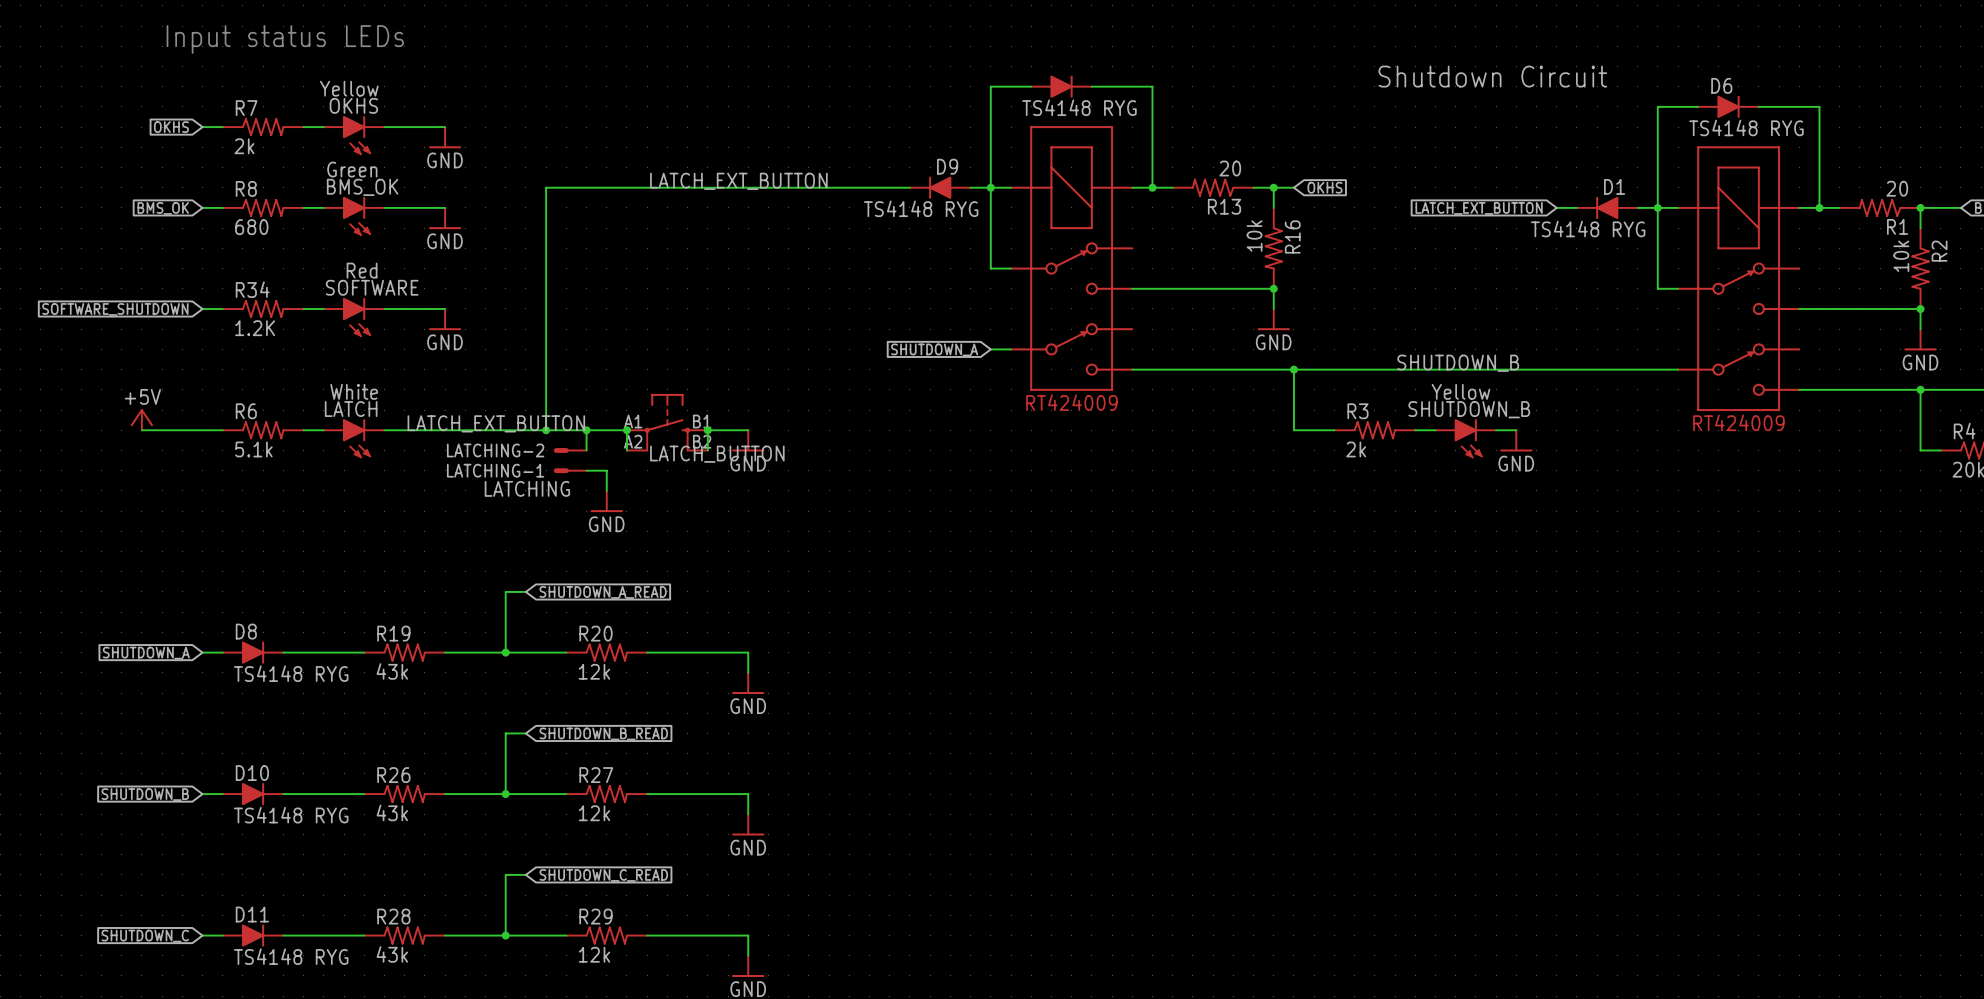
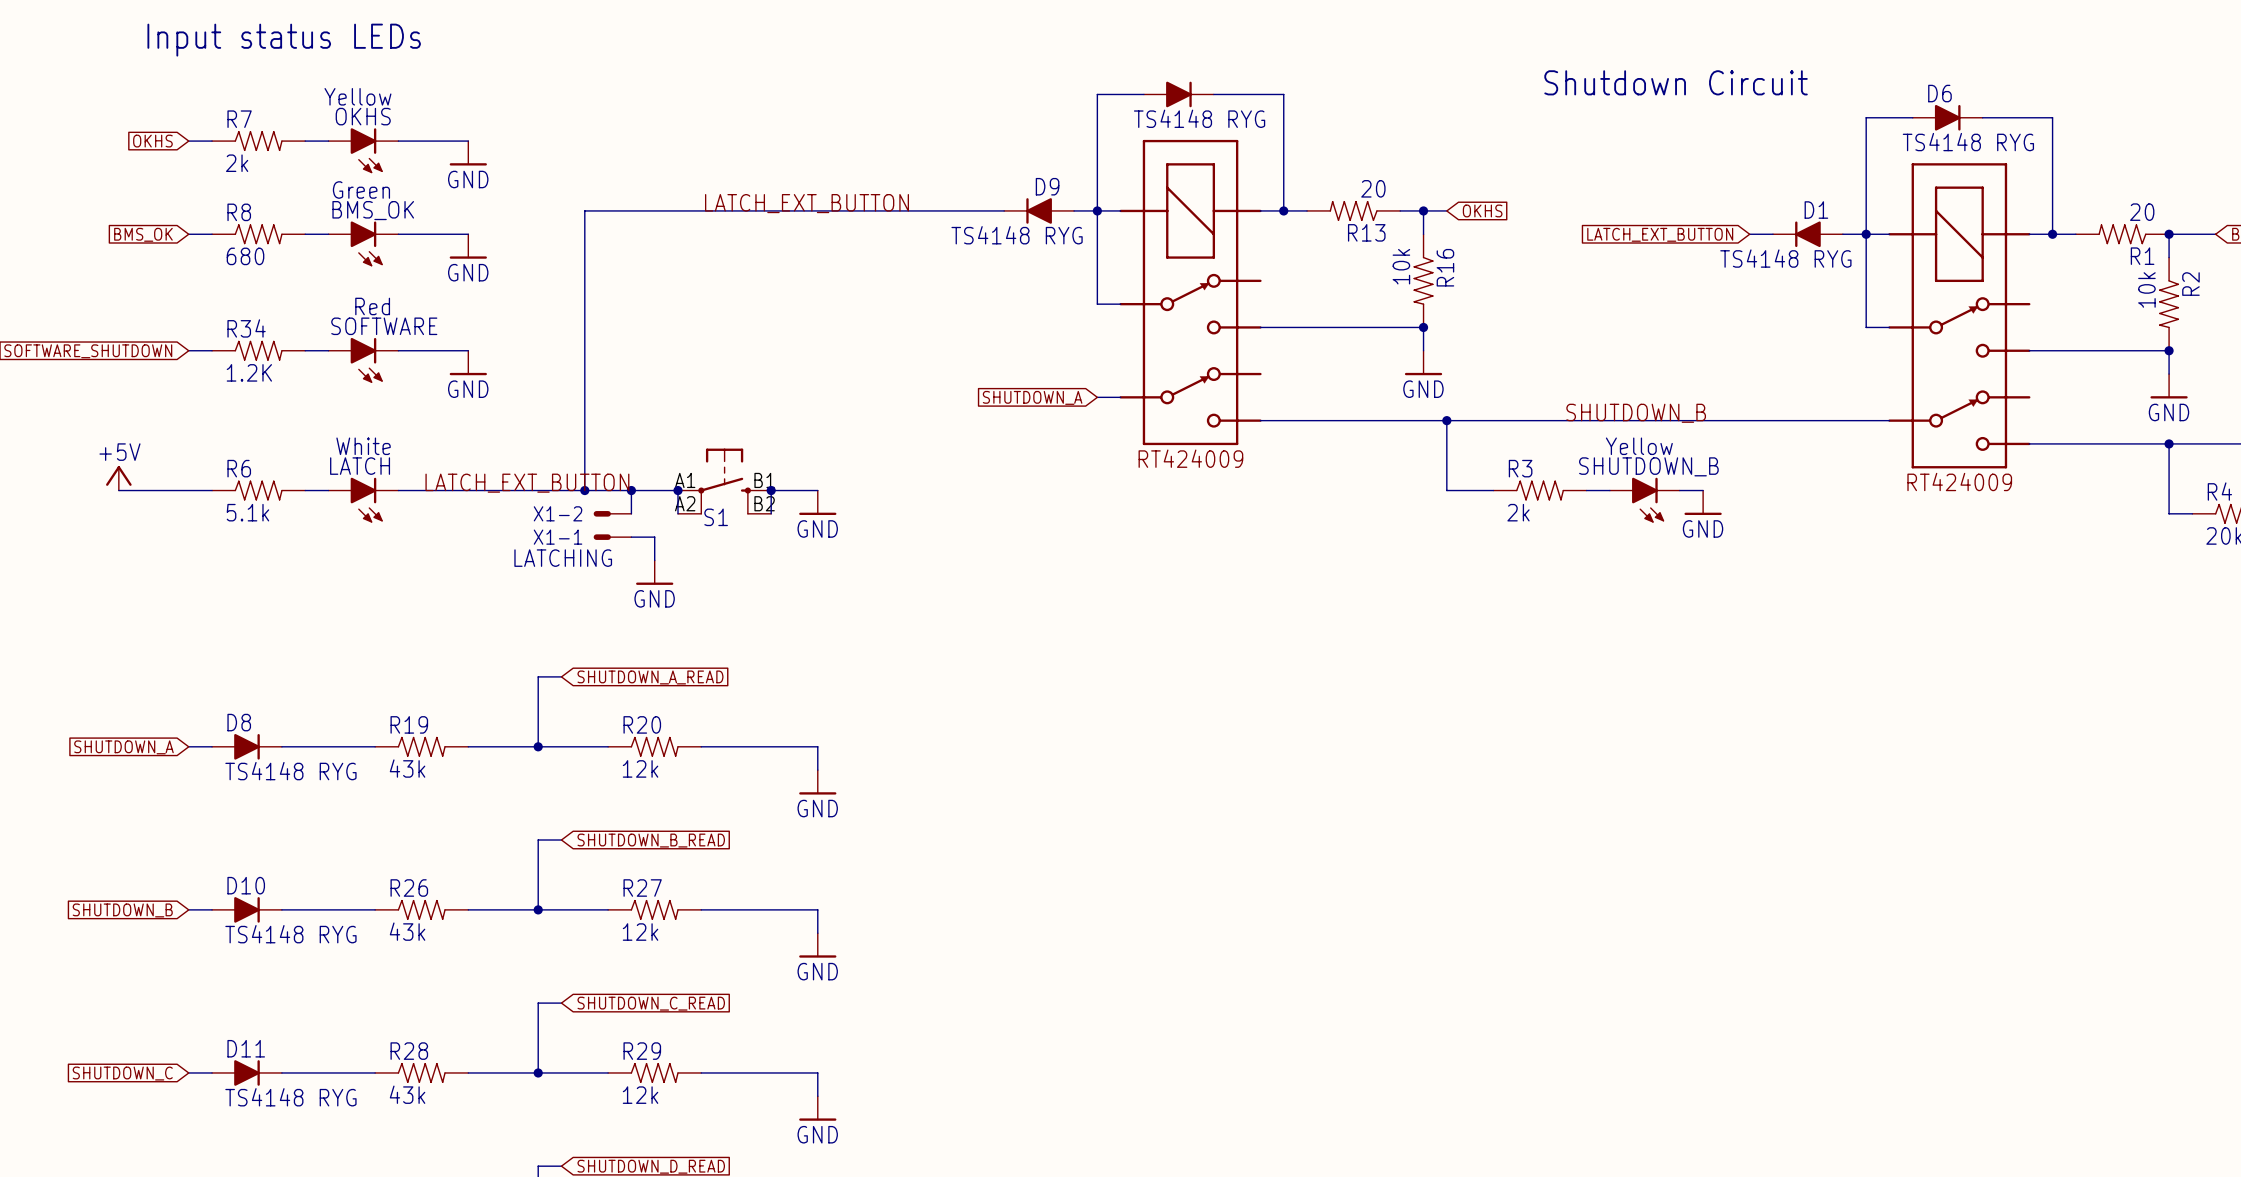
LATCHING-2 name: LATCHING-2 (495, 450) -> X1-2 (558, 513)
LATCH_BUTTON name: LATCH_BUTTON (717, 454) -> S1 (716, 517)
LATCHING-1 name: LATCHING-1 (495, 470) -> X1-1 (558, 537)

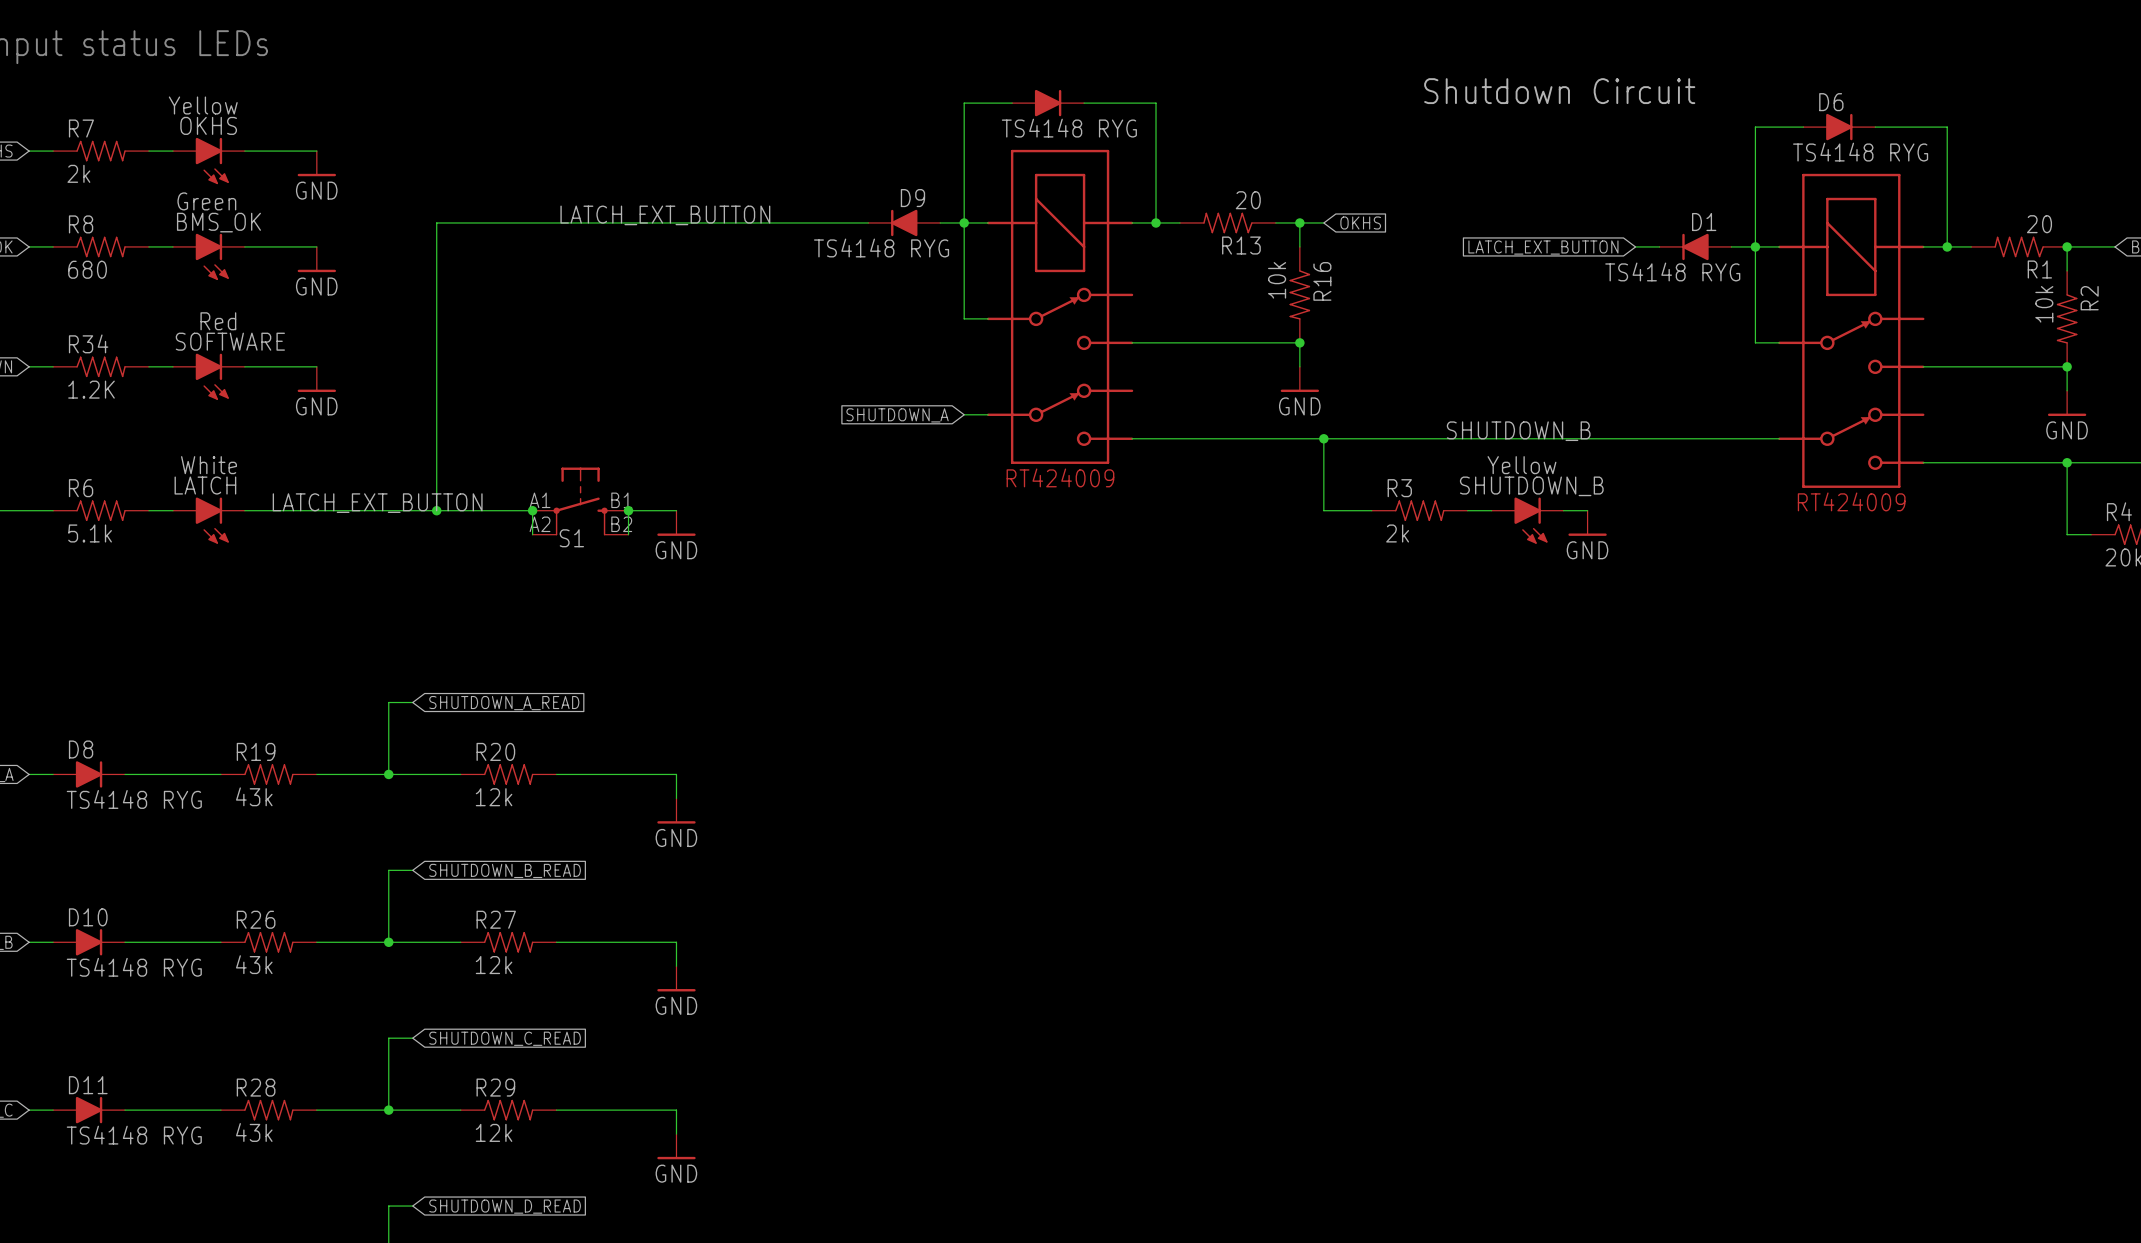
wire: (631, 490) (631, 513) -> none
junction: (631, 490) -> none
X1-2: (612, 513) -> none
X1-1: LATCHING (612, 537) -> none
wire: (631, 537) (654, 537) (654, 560) -> none
power symbol: GND (654, 572) -> none

